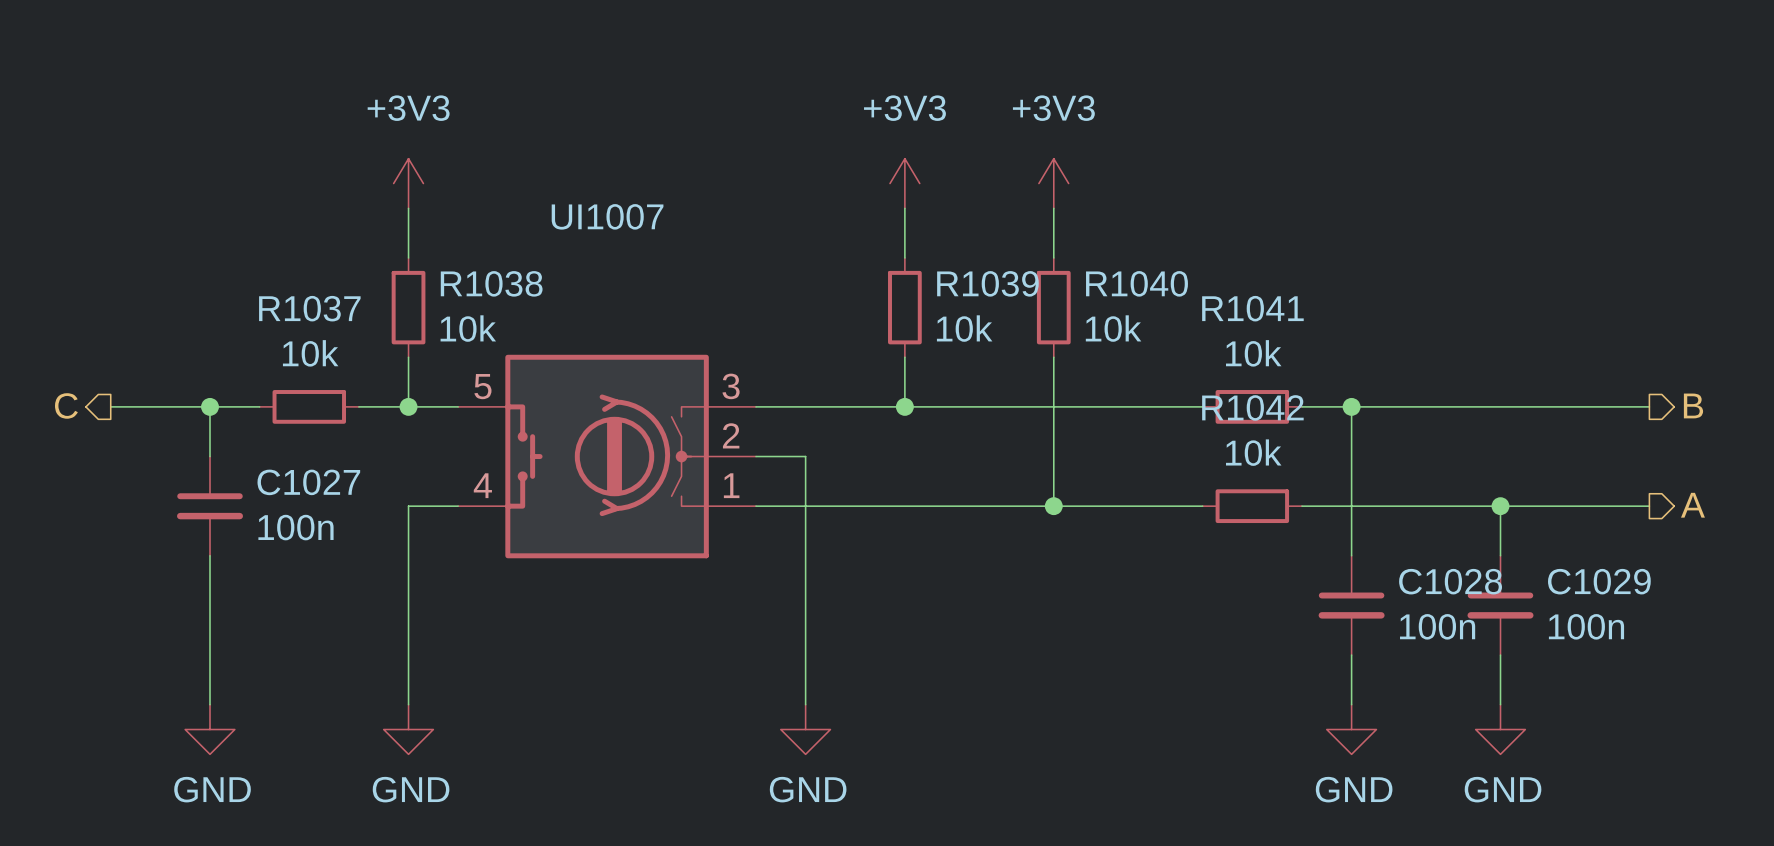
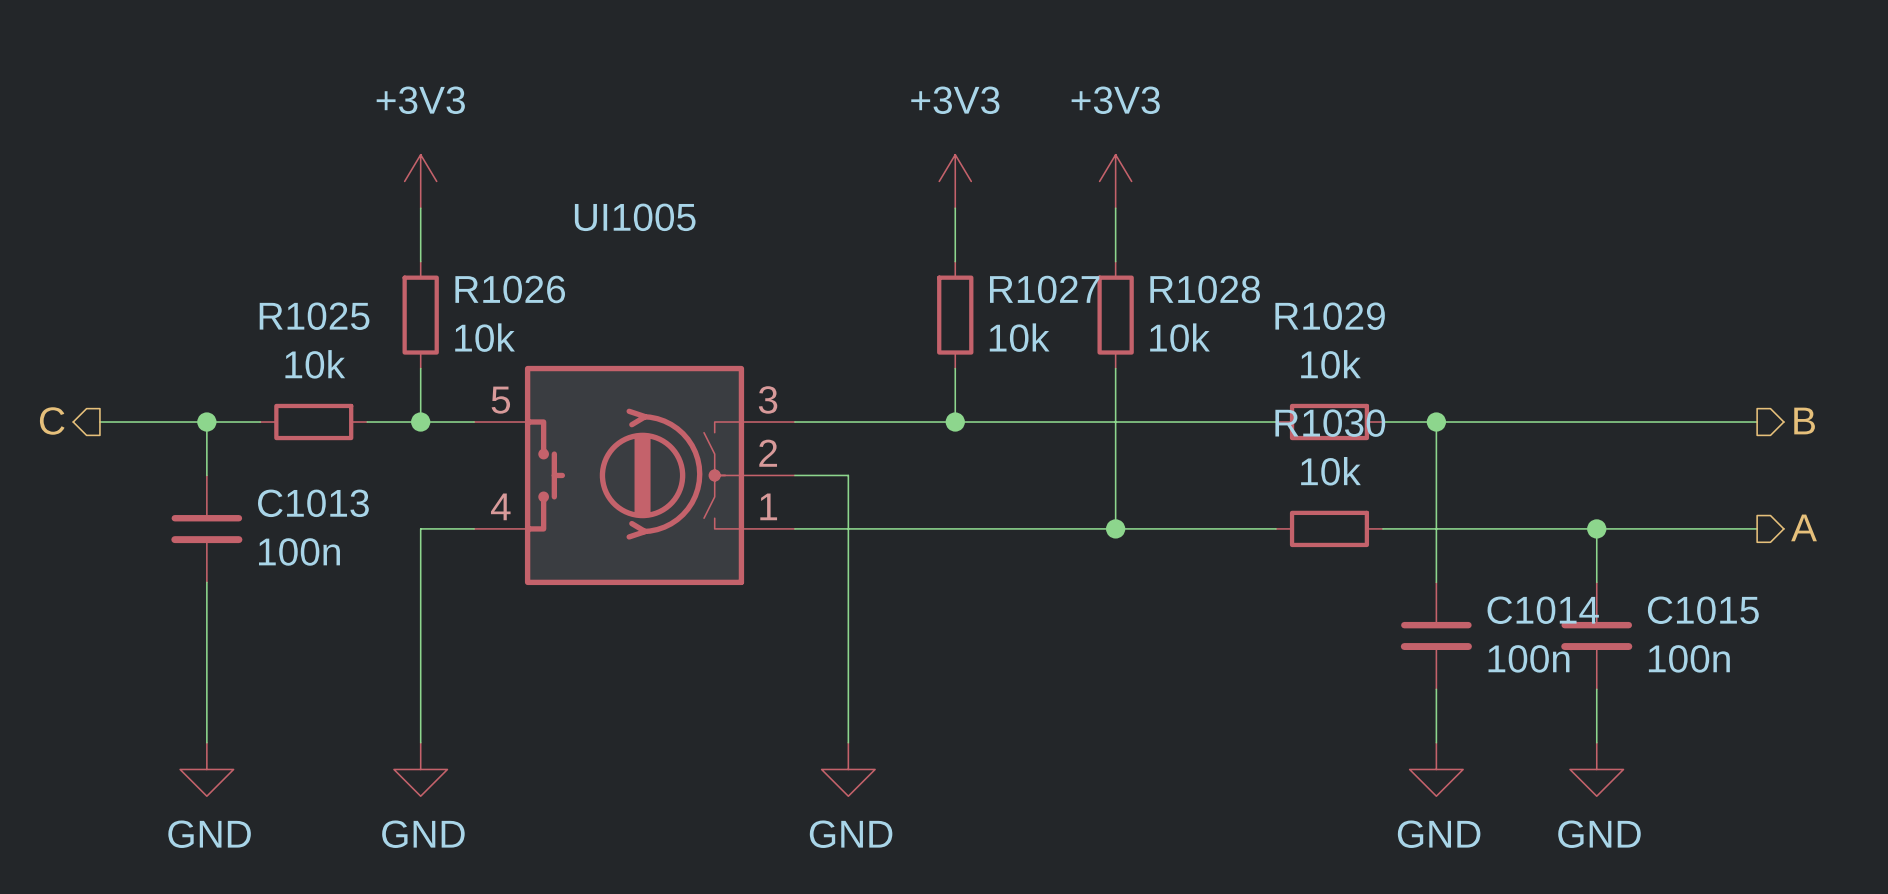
UI1007 name: UI1007 (607, 216) -> UI1005 (635, 217)
R1038 name: R1038 (491, 283) -> R1026 (510, 289)
R1039 name: R1039 (987, 283) -> R1027 (1044, 289)
R1040 name: R1040 (1137, 283) -> R1028 (1205, 289)
R1037 name: R1037 (309, 308) -> R1025 (314, 316)
R1041 name: R1041 (1252, 308) -> R1029 (1330, 316)
R1042 name: R1042 (1252, 407) -> R1030 (1330, 423)
C1027 name: C1027 (308, 482) -> C1013 (313, 503)
C1028 name: C1028 (1450, 581) -> C1014 (1543, 610)
C1029 name: C1029 (1599, 581) -> C1015 (1703, 610)

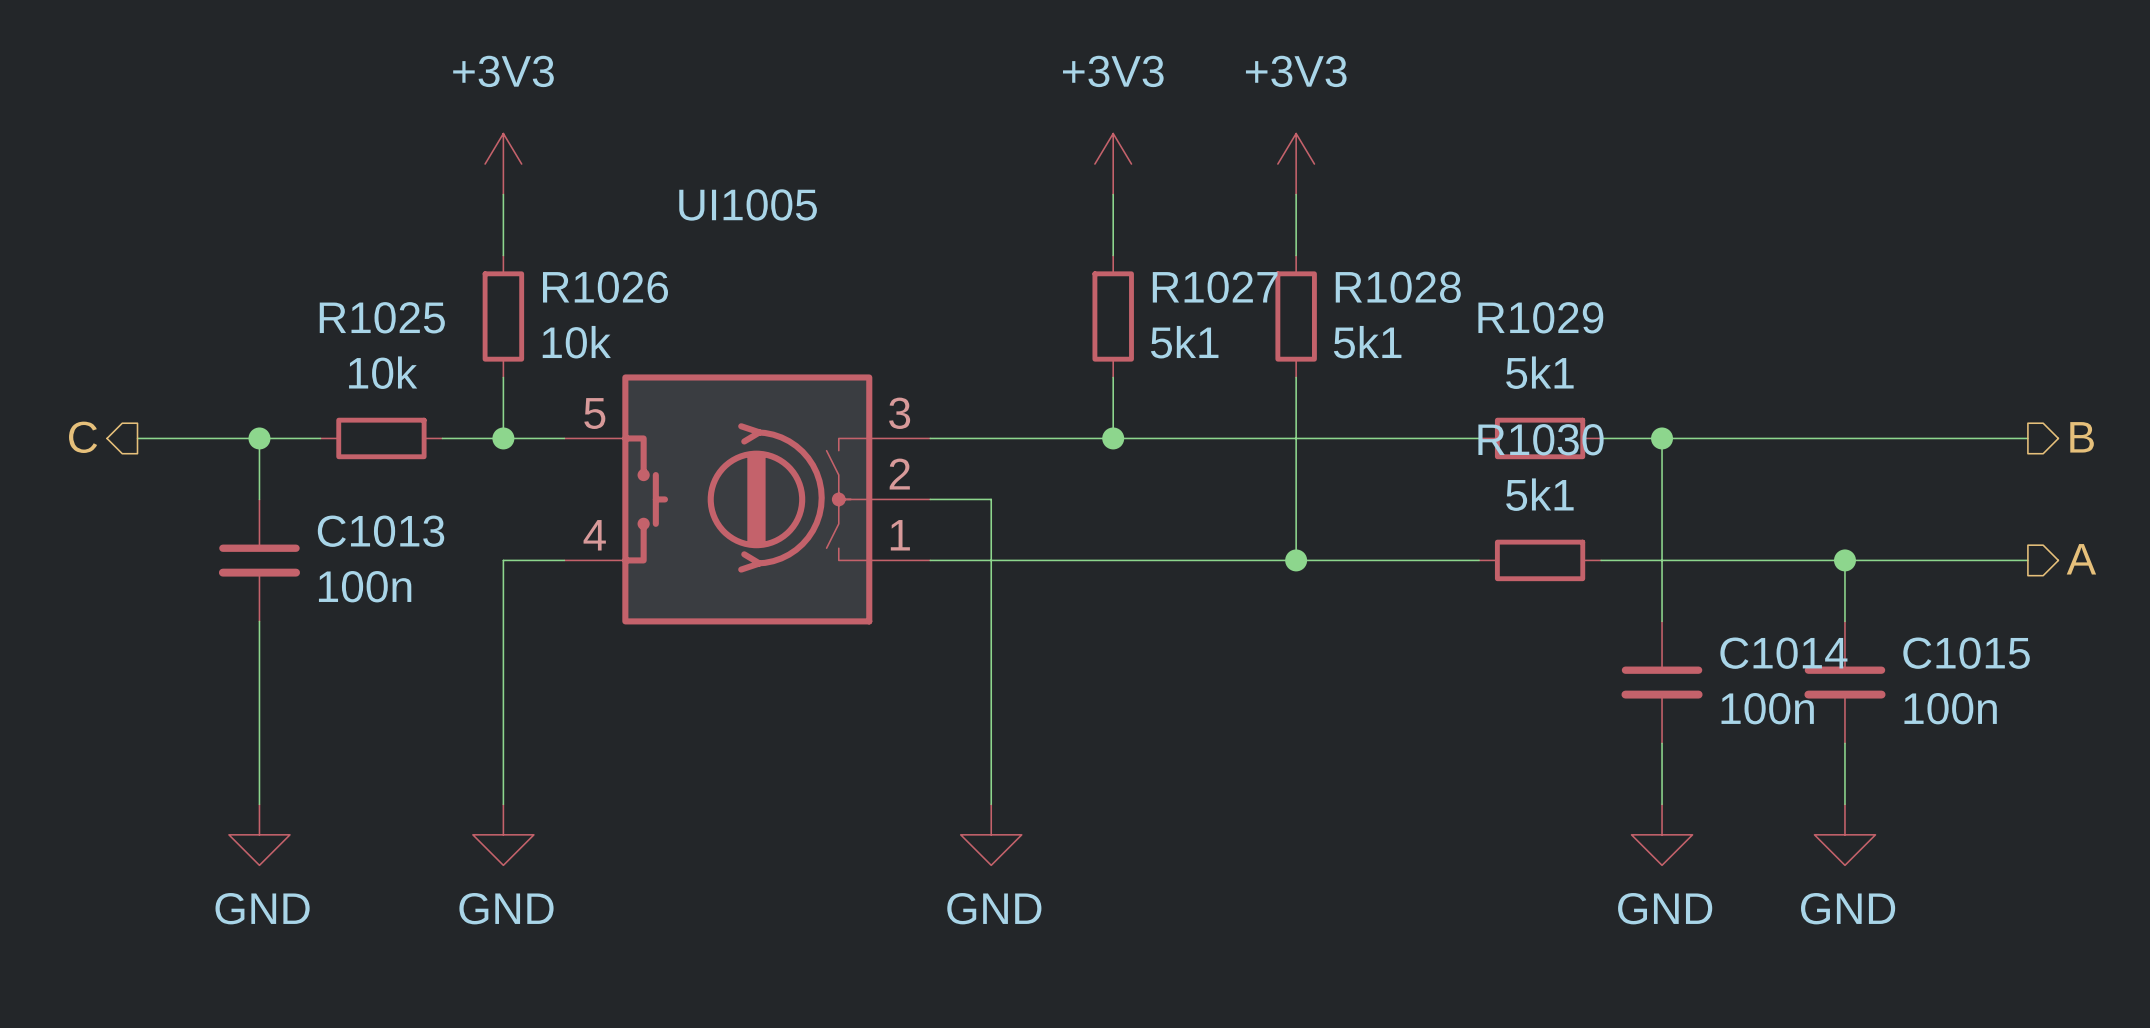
R1027 value: 10k (1019, 337) -> 5k1 (1184, 342)
R1028 value: 10k (1180, 337) -> 5k1 (1367, 342)
R1029 value: 10k (1330, 364) -> 5k1 (1539, 372)
R1030 value: 10k (1330, 471) -> 5k1 (1539, 494)

